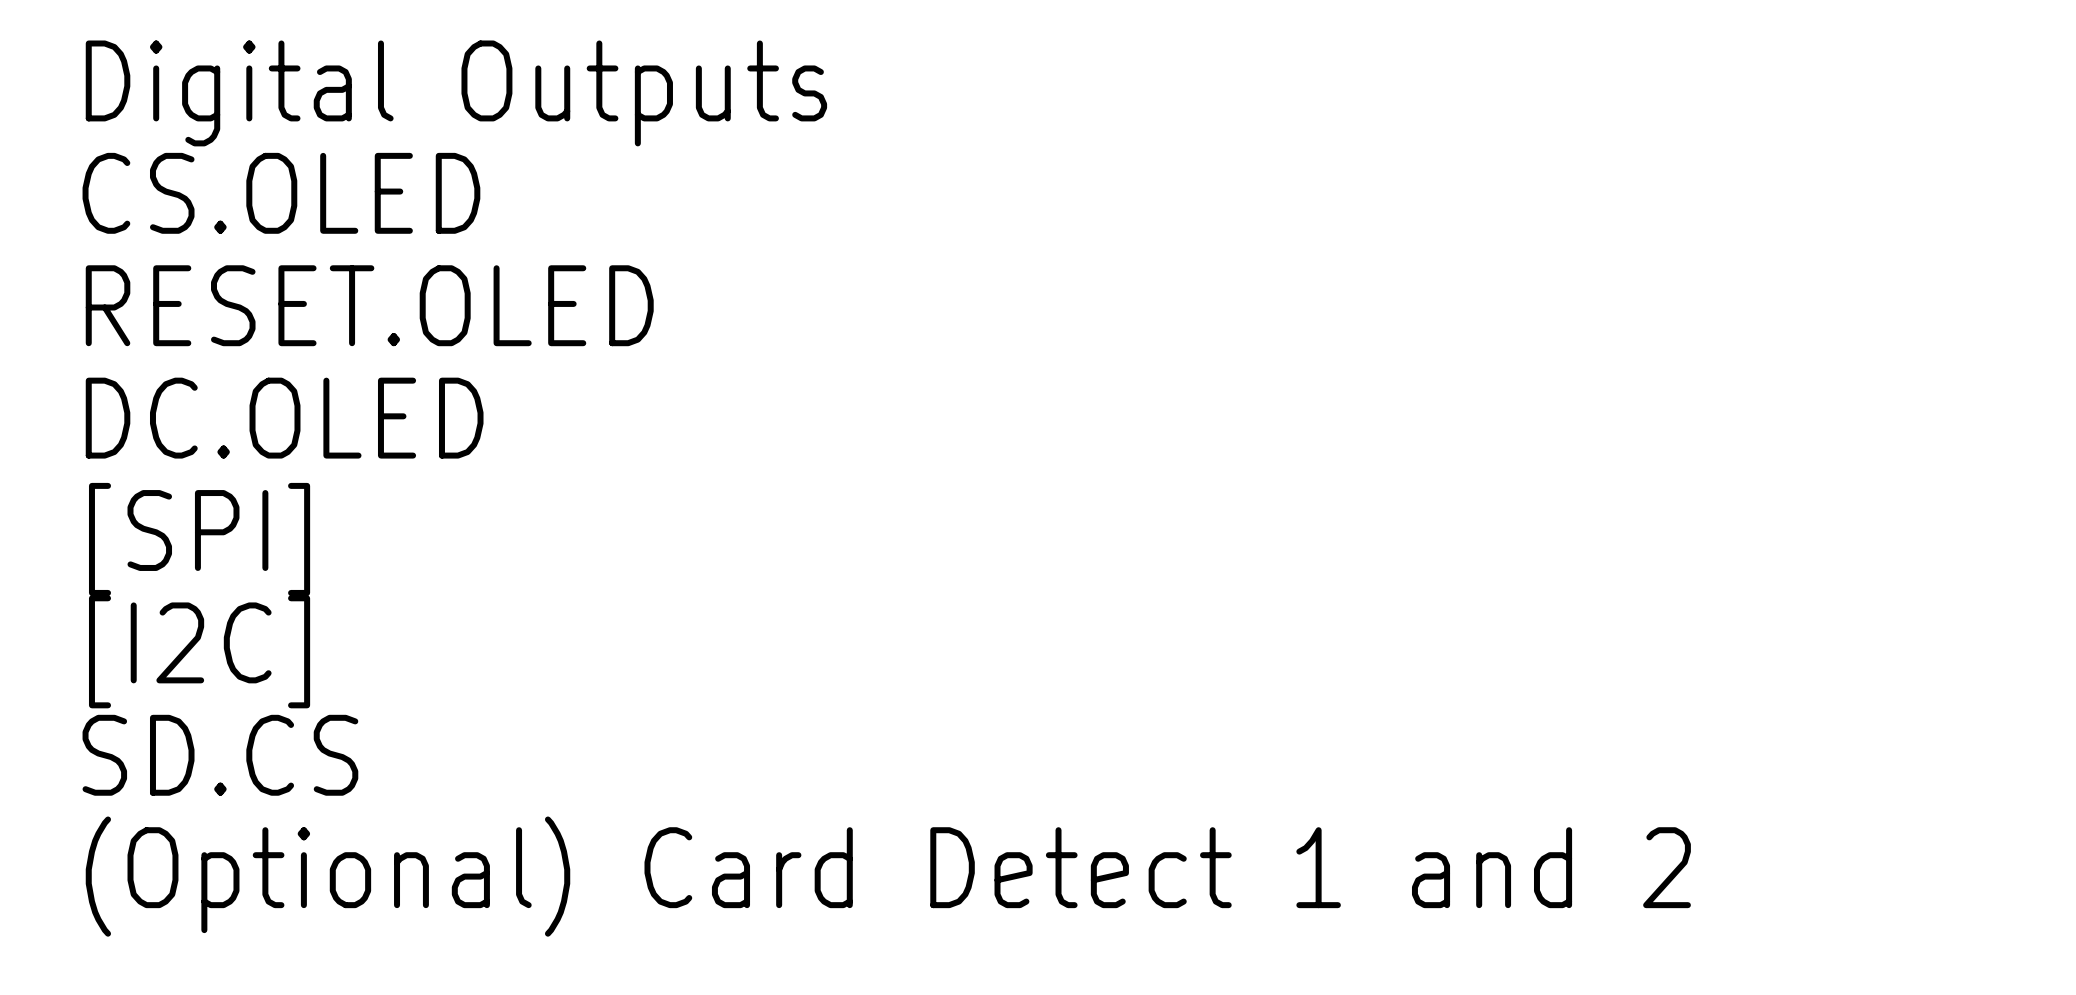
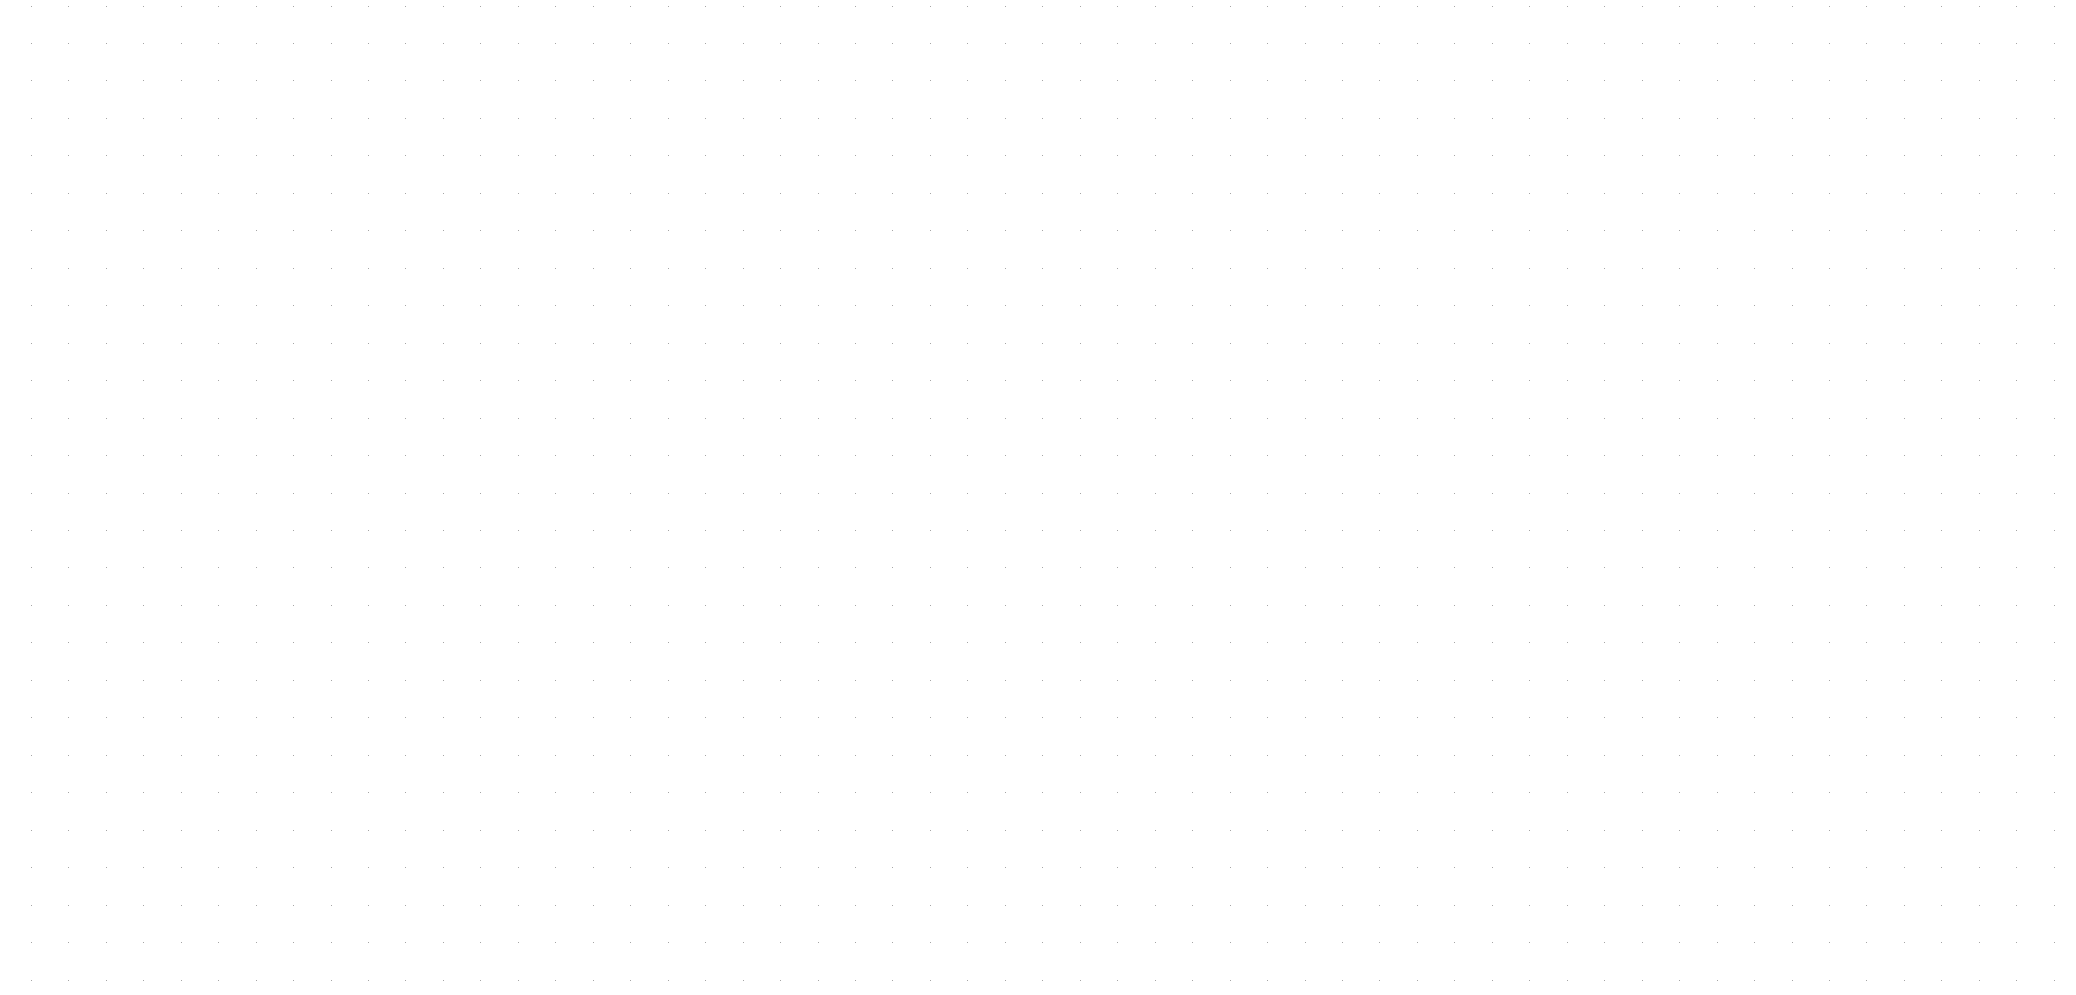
text: Digital Outputs (456, 93) -> none
text: CS.OLED (281, 193) -> none
text: RESET.OLED (369, 305) -> none
text: DC.OLED (284, 418) -> none
text: [SPI] (199, 539) -> none
text: [I2C] (199, 651) -> none
text: SD.CS (220, 755) -> none
text: (Optional) Card Detect 1 and 2 (888, 876) -> none

